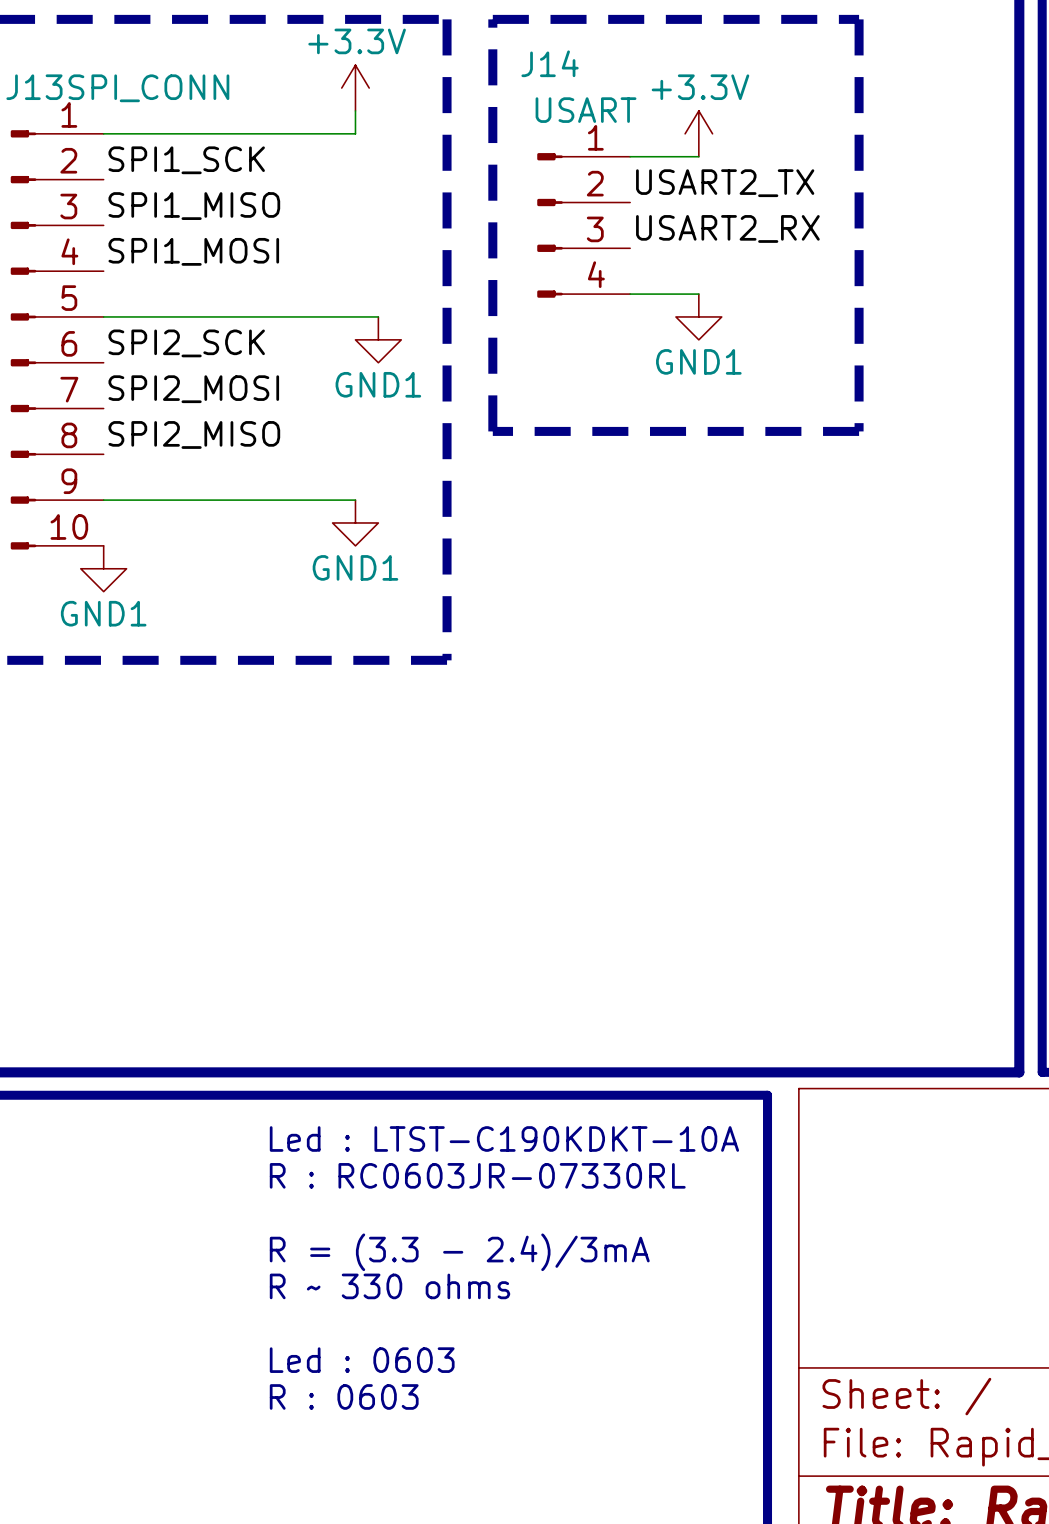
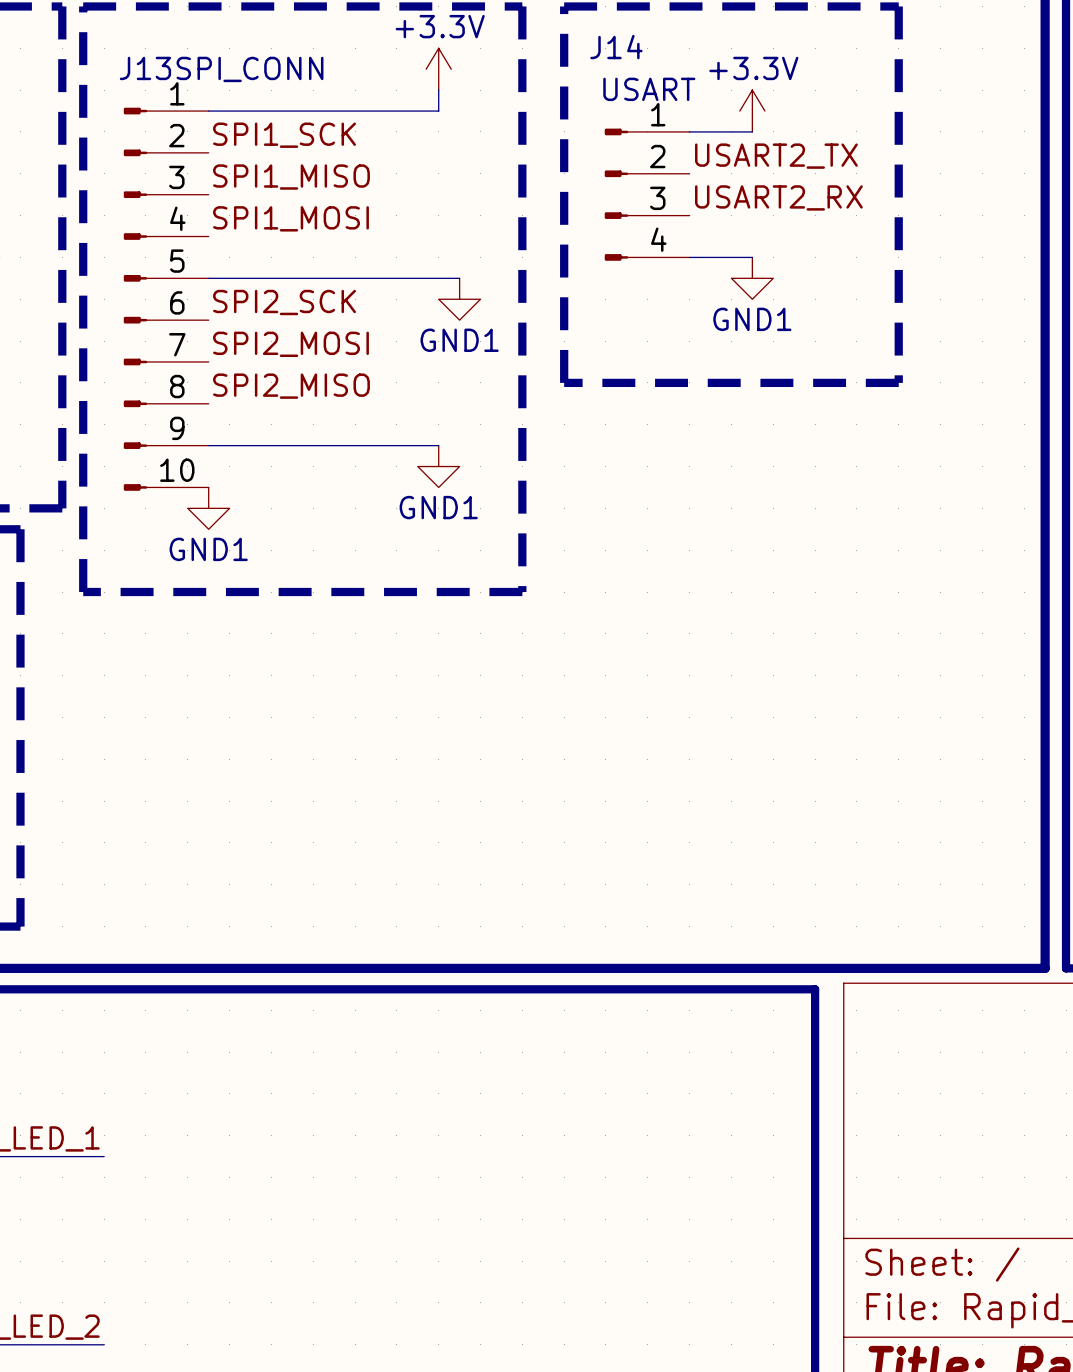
text: Led : LTST-C190KDKT-10A (504, 1138) -> none
text: R : RC0603JR-07330RL (477, 1175) -> none
text: R = (3.3 - 2.4)/3mA (459, 1252) -> none
text: R ~ 330 ohms (389, 1286) -> none
text: Led : 0603 (362, 1360) -> none
text: R : 0603 (344, 1396) -> none

